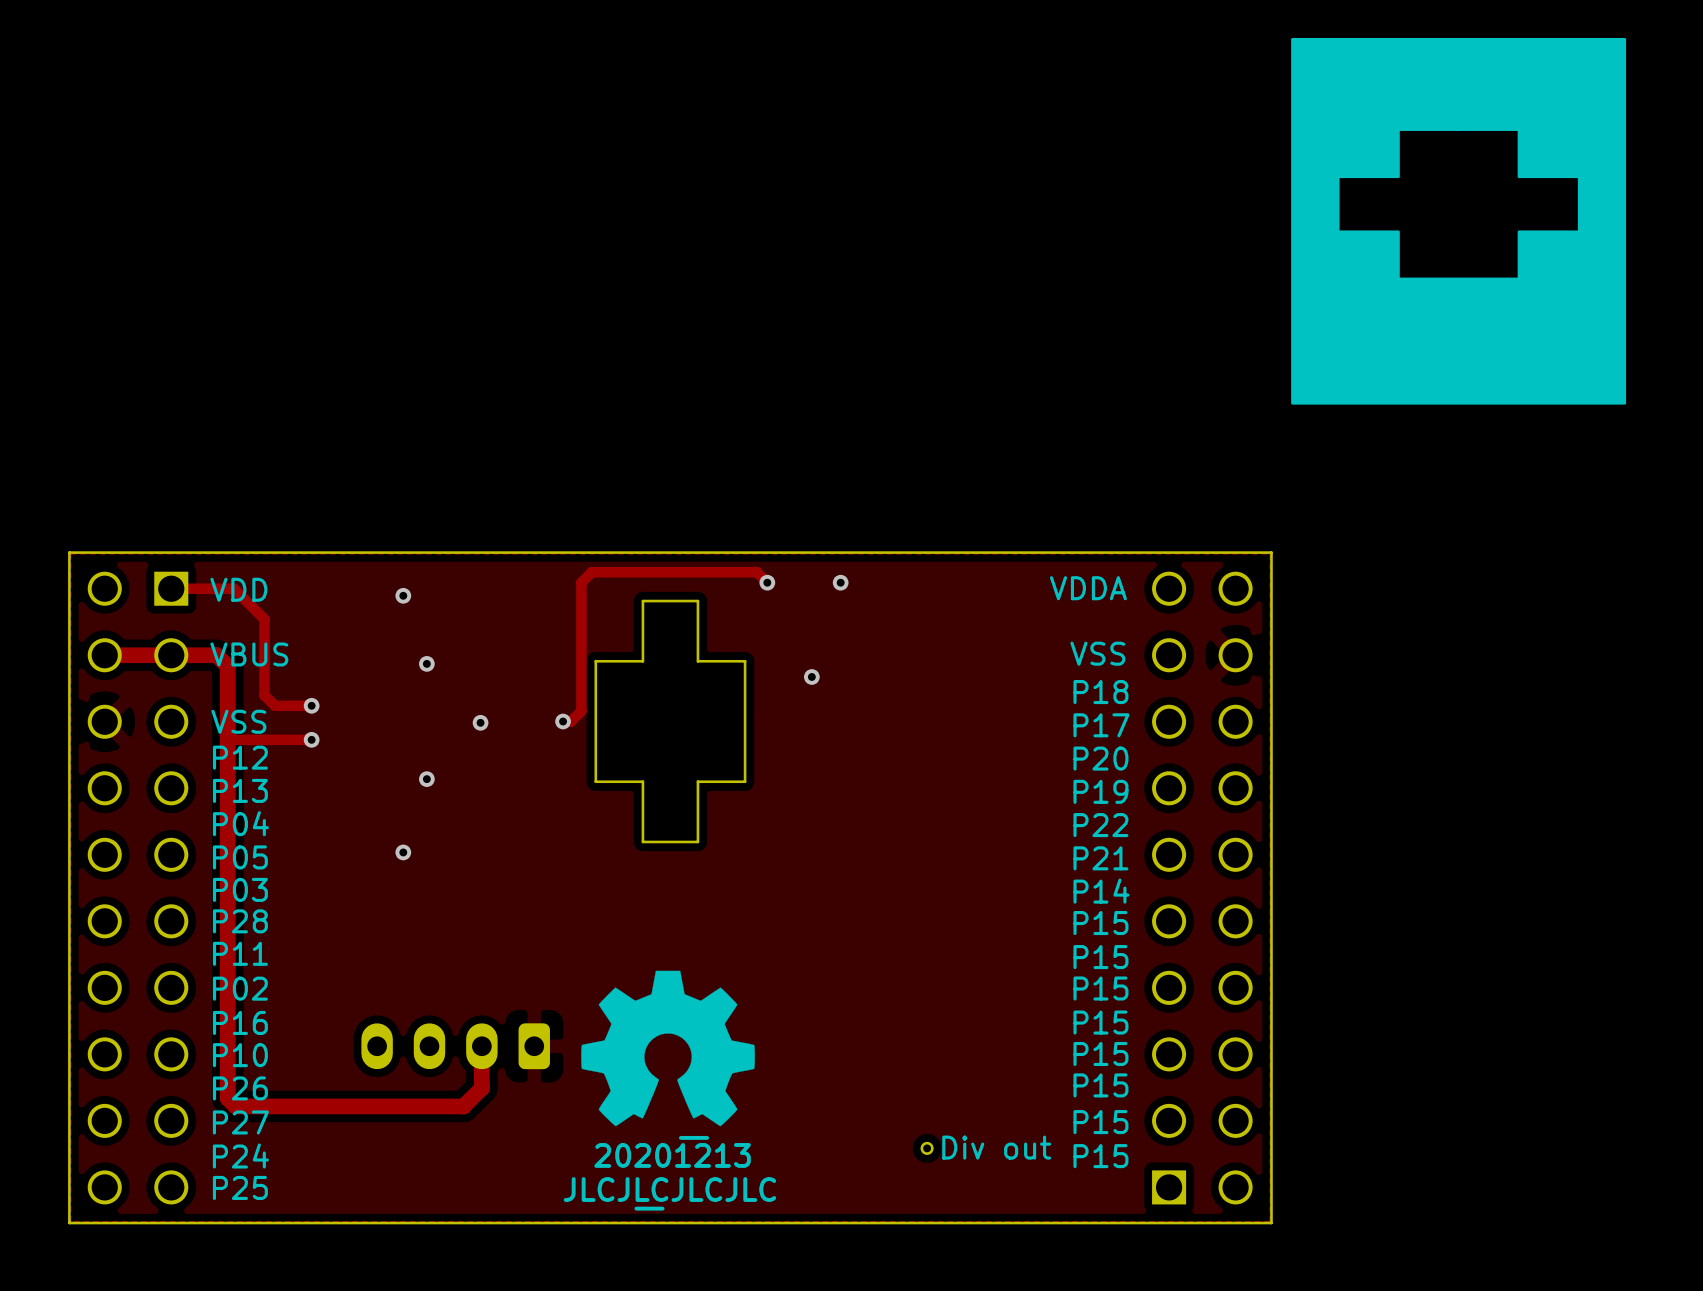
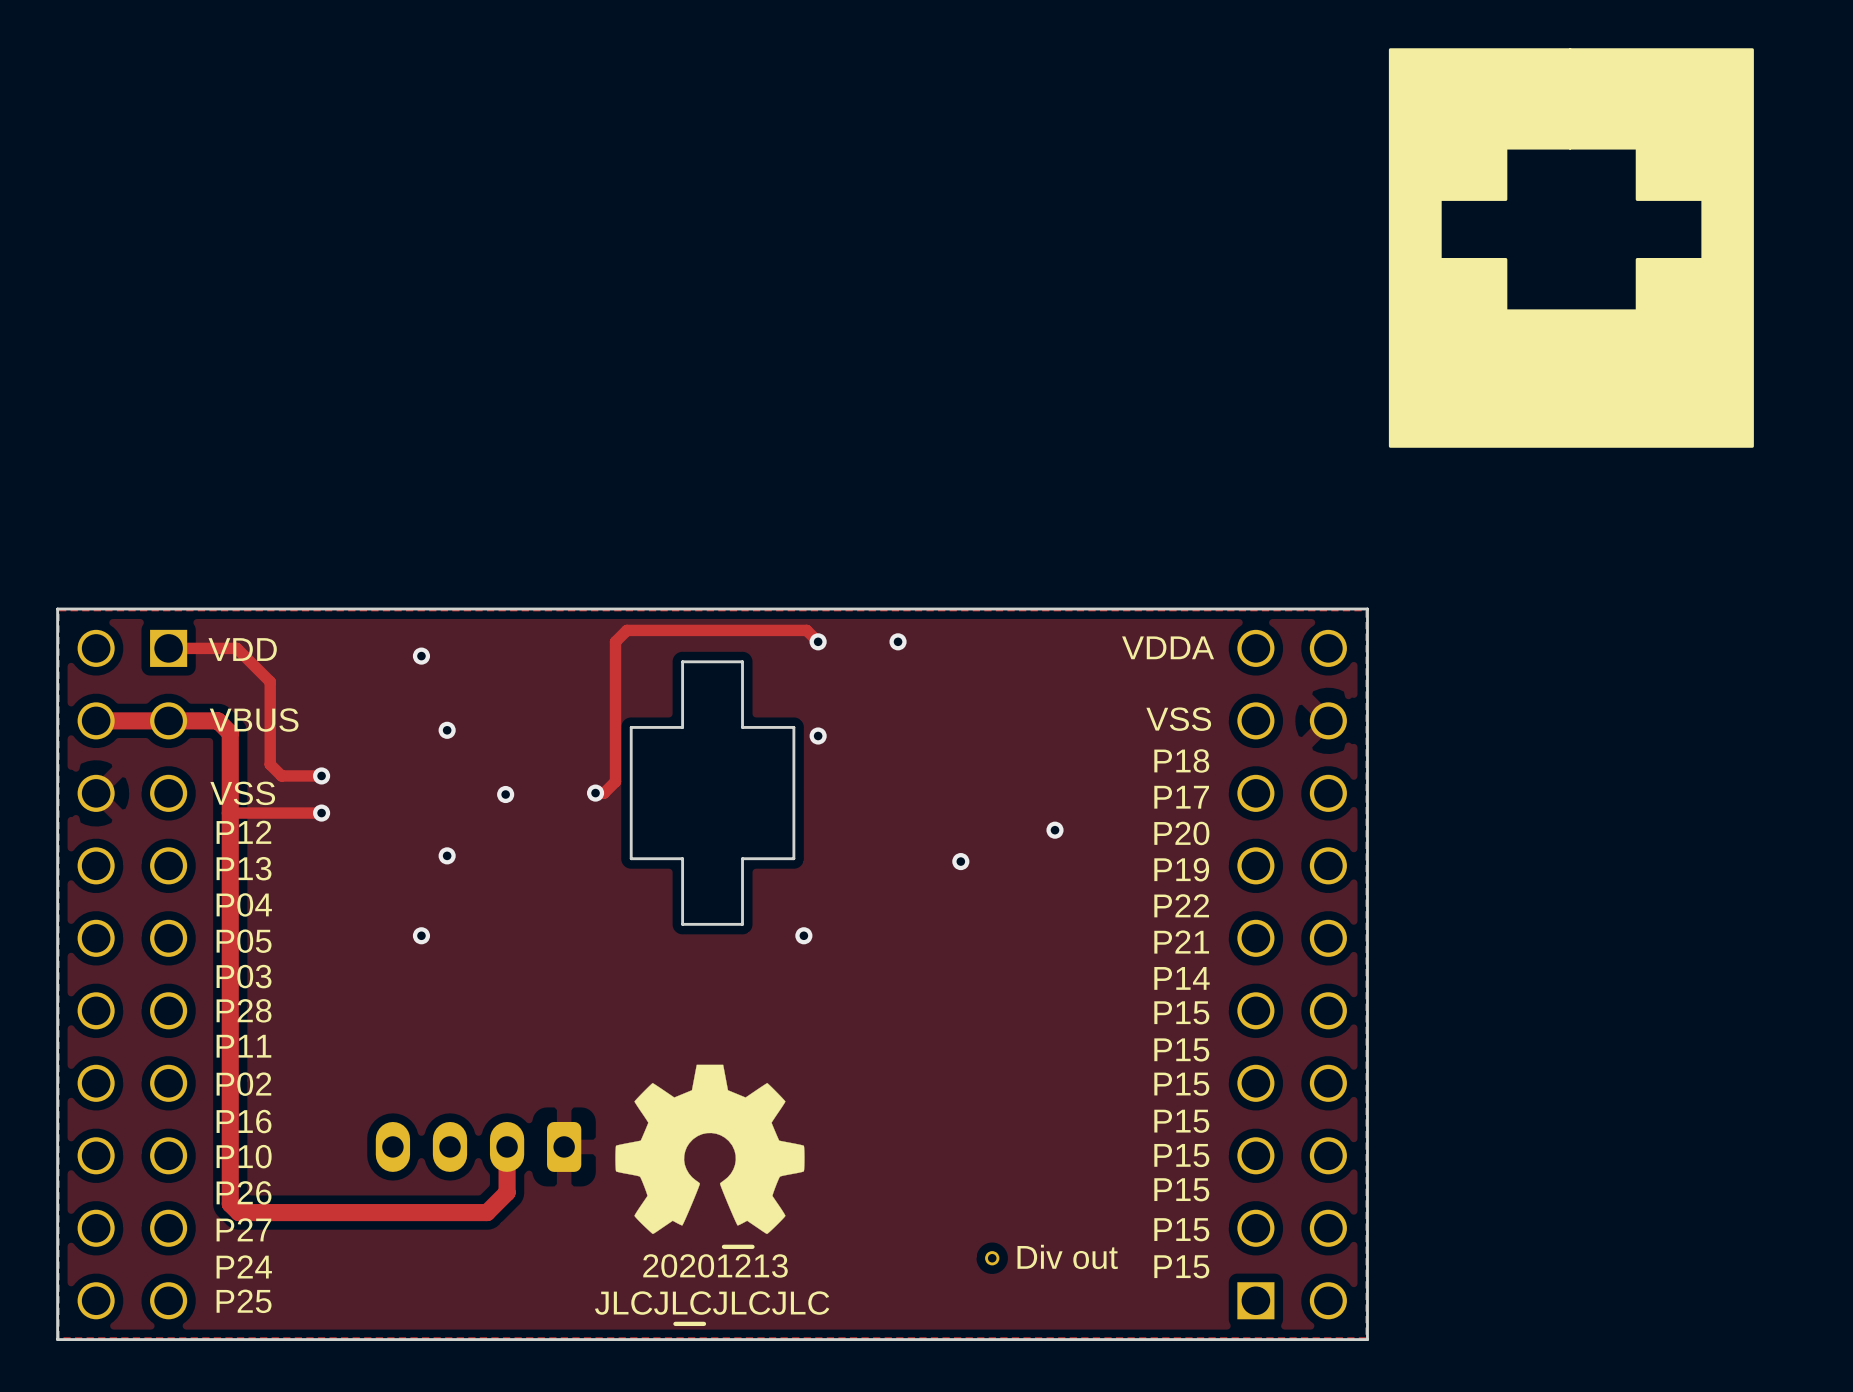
via position: (811, 676) -> (818, 736)
via: none -> (1055, 830)
via: none -> (960, 861)
via: none -> (803, 935)

